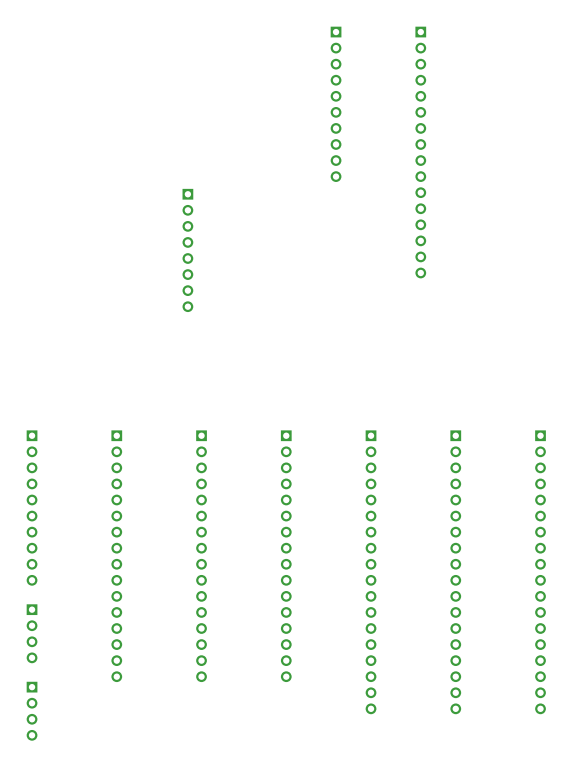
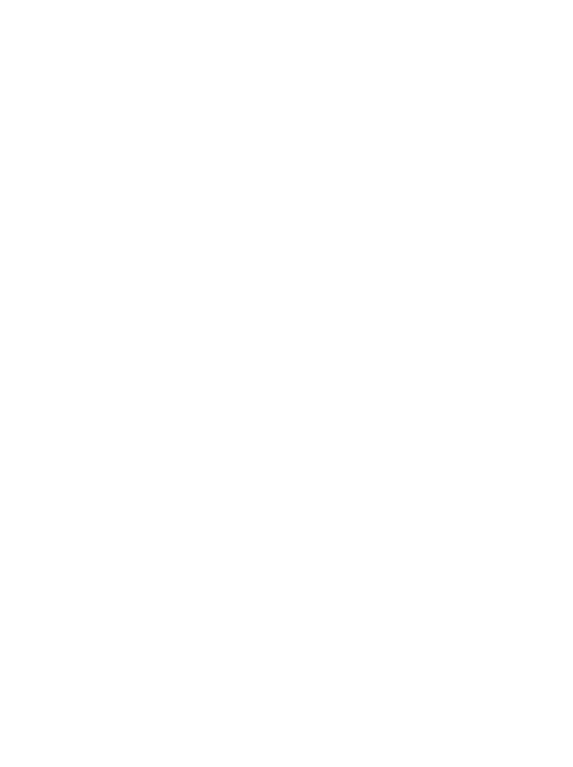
part: (336, 104) -> none
part: (420, 152) -> none
part: (187, 250) -> none
part: (32, 508) -> none
part: (116, 556) -> none
part: (201, 556) -> none
part: (286, 556) -> none
part: (371, 572) -> none
part: (455, 572) -> none
part: (540, 572) -> none
part: (32, 633) -> none
part: (32, 711) -> none

